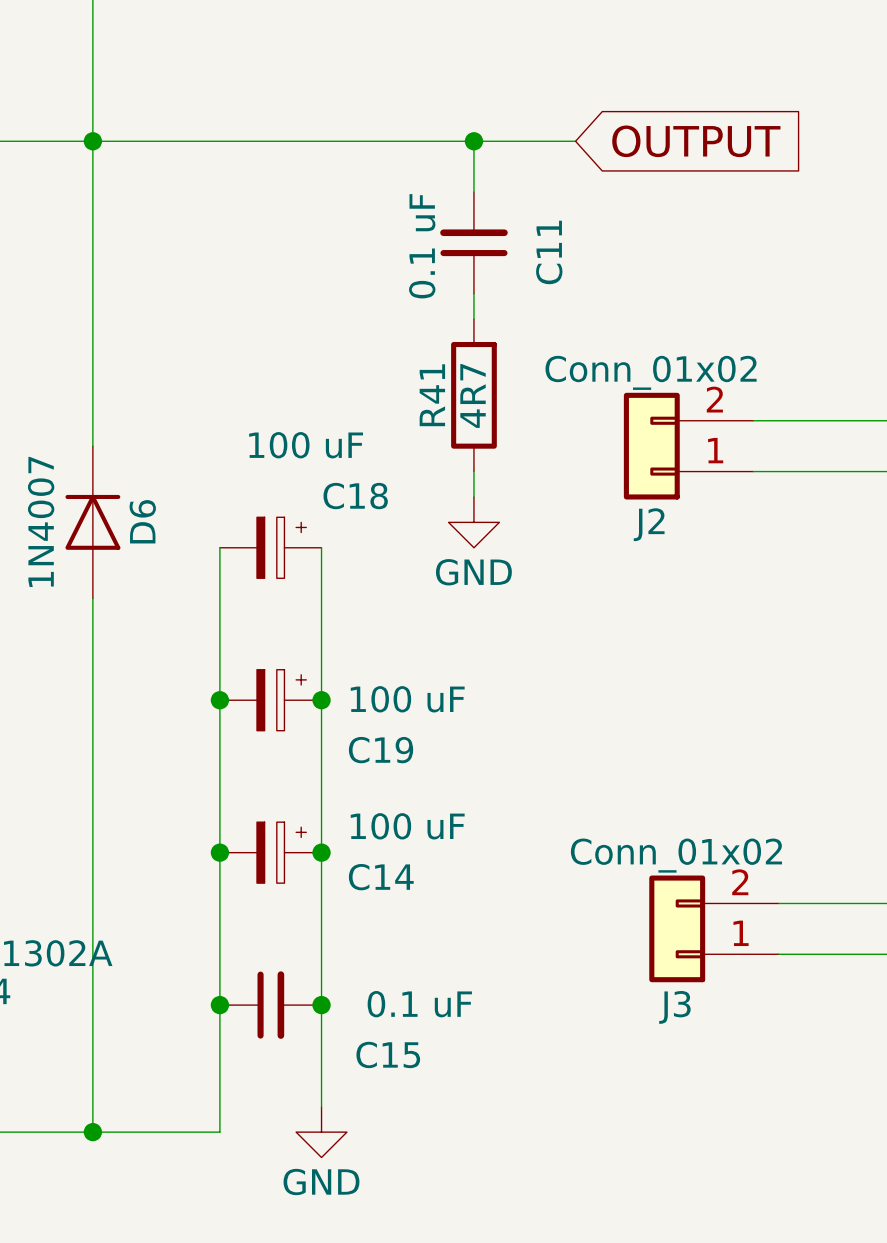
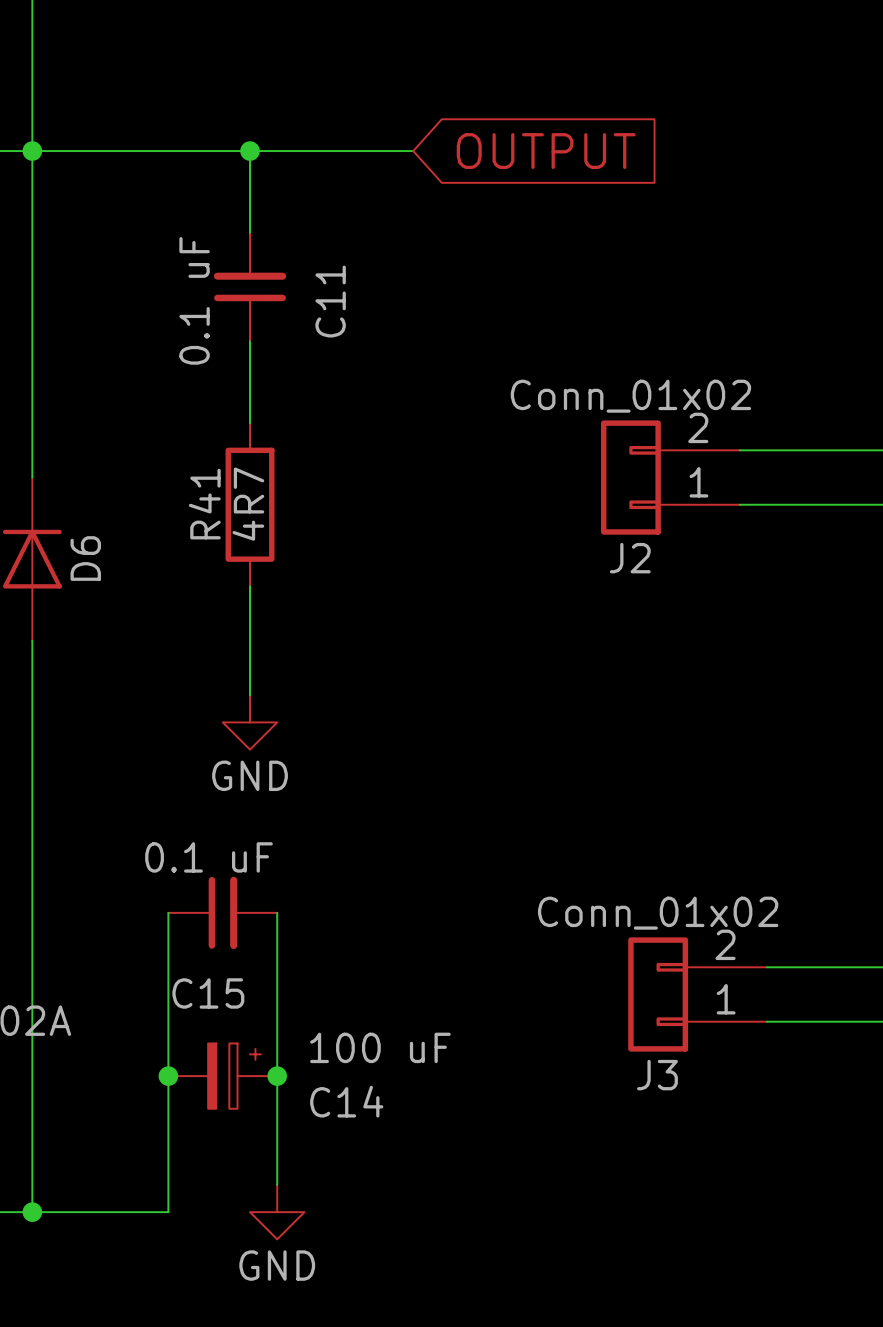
wire: none -> (250, 151) (250, 232)
junction: none -> (250, 151)
wire: (448, 141) (575, 141) -> none
wire: (473, 141) (473, 192) -> none
junction: (473, 141) -> none
global label position: OUTPUT (696, 141) -> OUTPUT (546, 151)
C11 position: (473, 242) -> (250, 287)
wire: (473, 293) (473, 319) -> none
wire: none -> (250, 341) (250, 423)
R41 position: (473, 395) -> (250, 504)
wire: (473, 471) (473, 496) -> none
power symbol position: GND (473, 522) -> GND (250, 722)
wire: (219, 547) (219, 852) -> none
C18: 100 uF (270, 547) -> none
wire: none -> (250, 586) (250, 695)
wire: (321, 547) (321, 852) -> none
junction: (219, 700) -> none
C19: 100 uF (270, 700) -> none
junction: (321, 700) -> none
junction: (219, 852) -> none
C14 position: (270, 852) -> (222, 1076)
junction: (321, 852) -> none
C15 value position: 0.1 uF (419, 1004) -> 0.1 uF (209, 857)
C15 position: (270, 1005) -> (222, 912)
C15 name position: C15 (388, 1054) -> C15 (208, 993)

